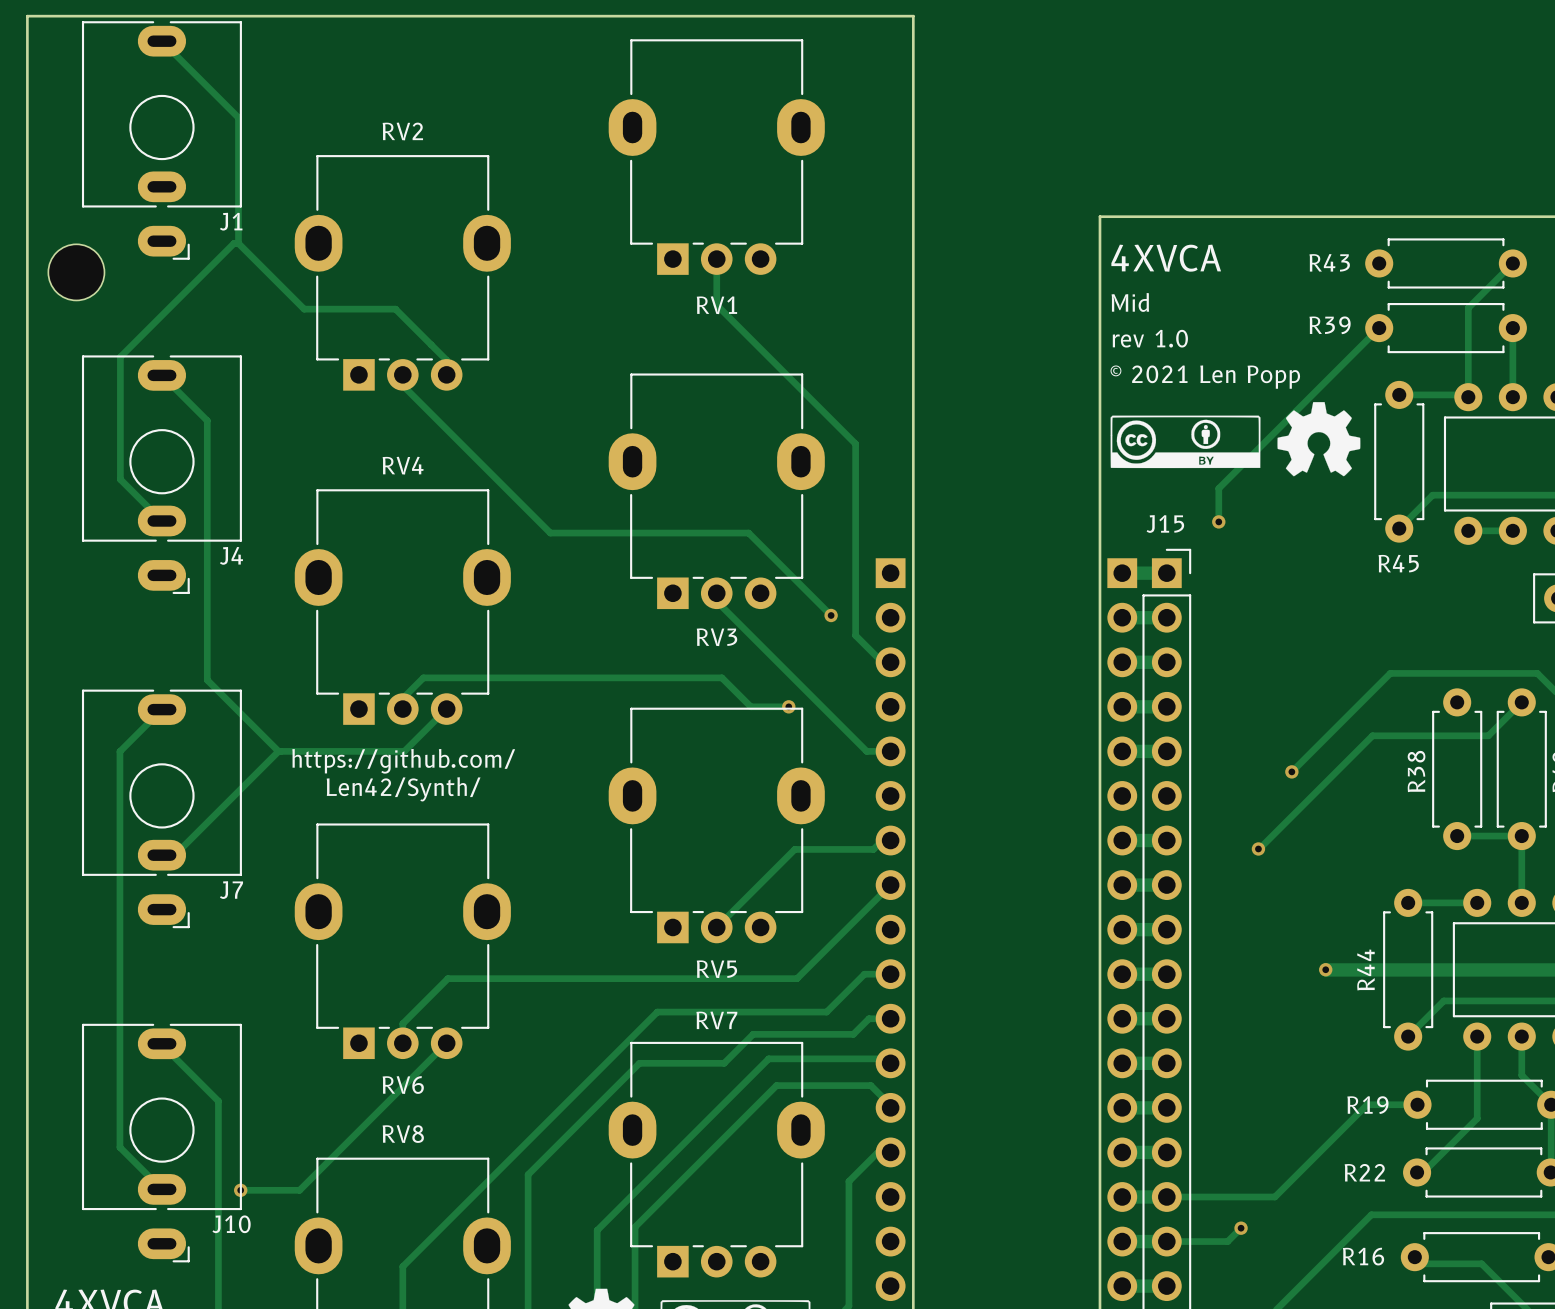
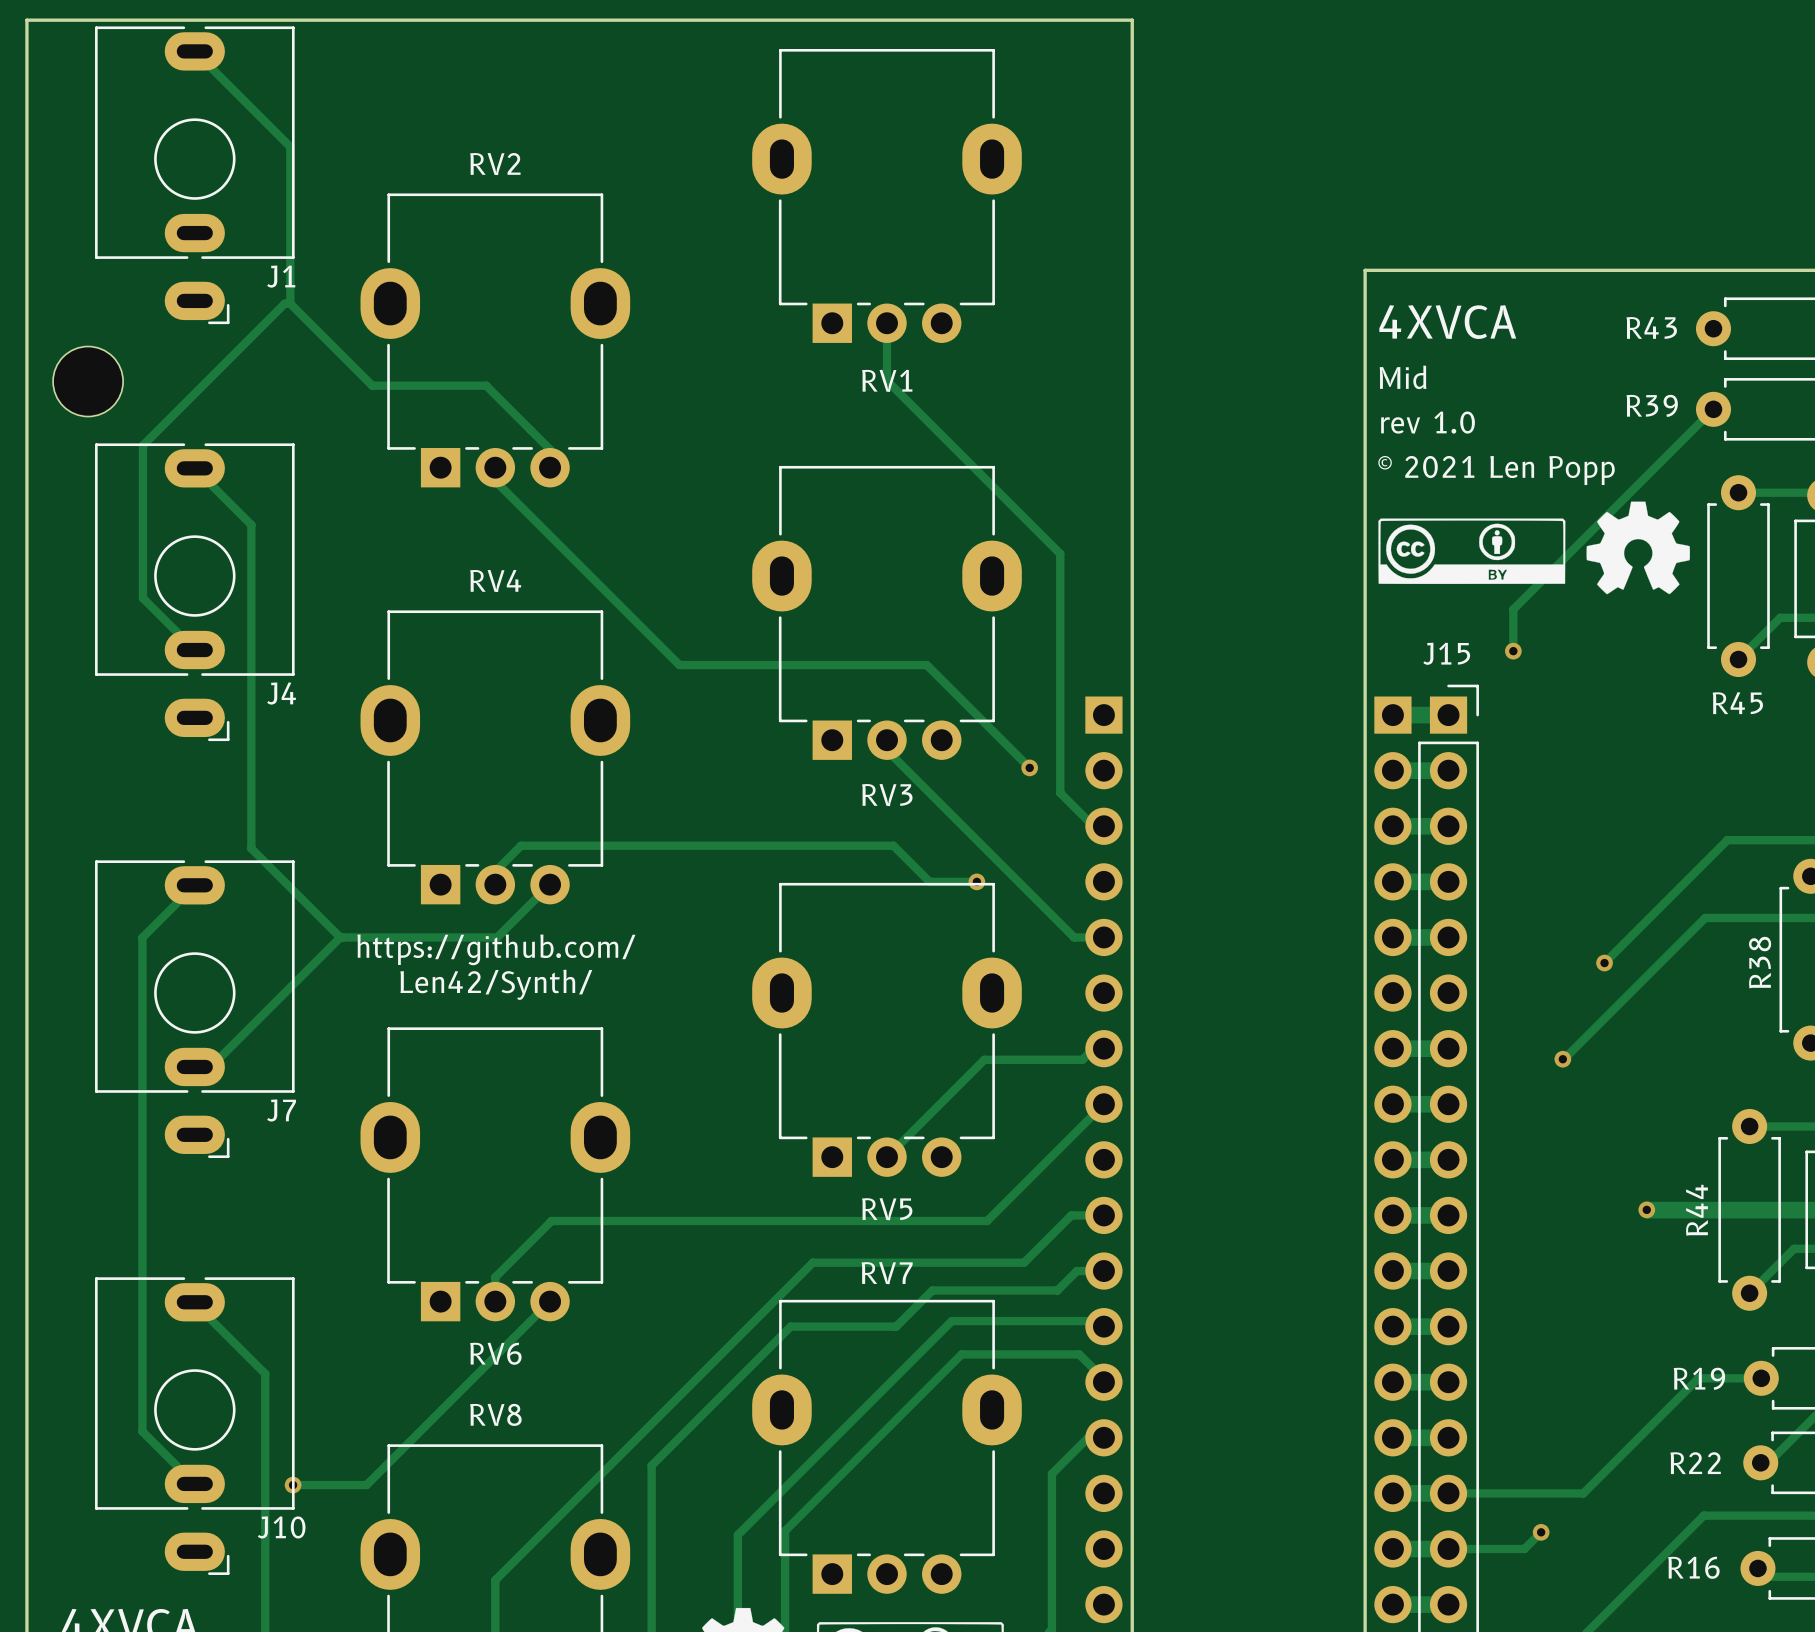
part position: (76, 272) -> (88, 381)

